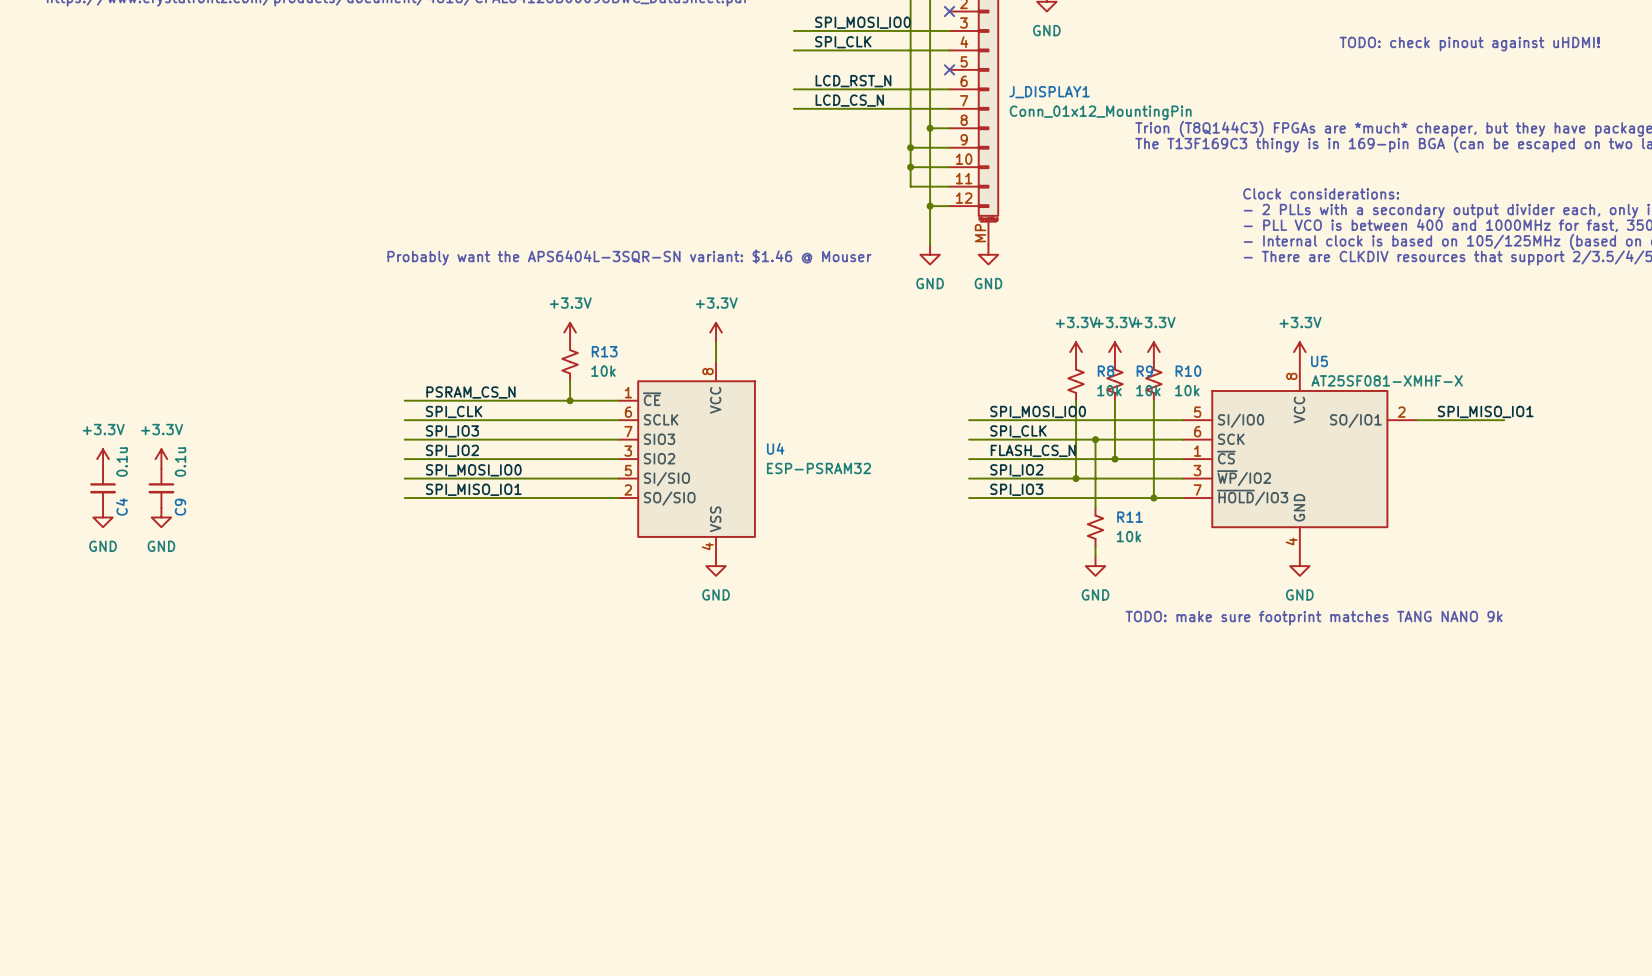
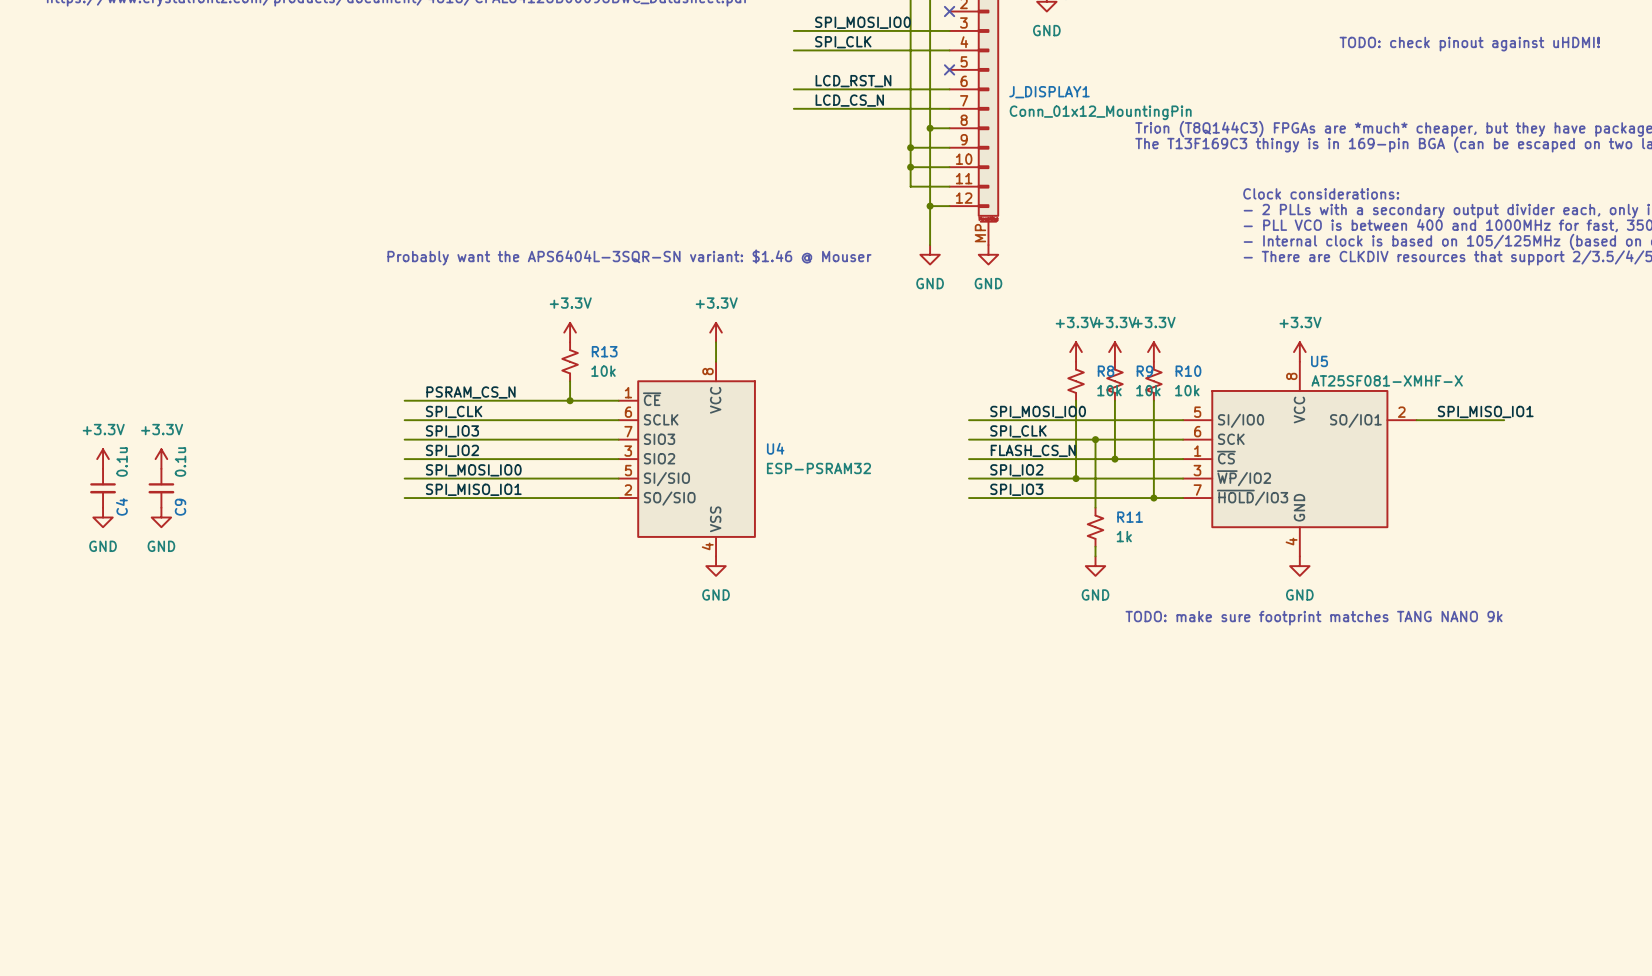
R11 value: 10k (1128, 536) -> 1k (1124, 536)

